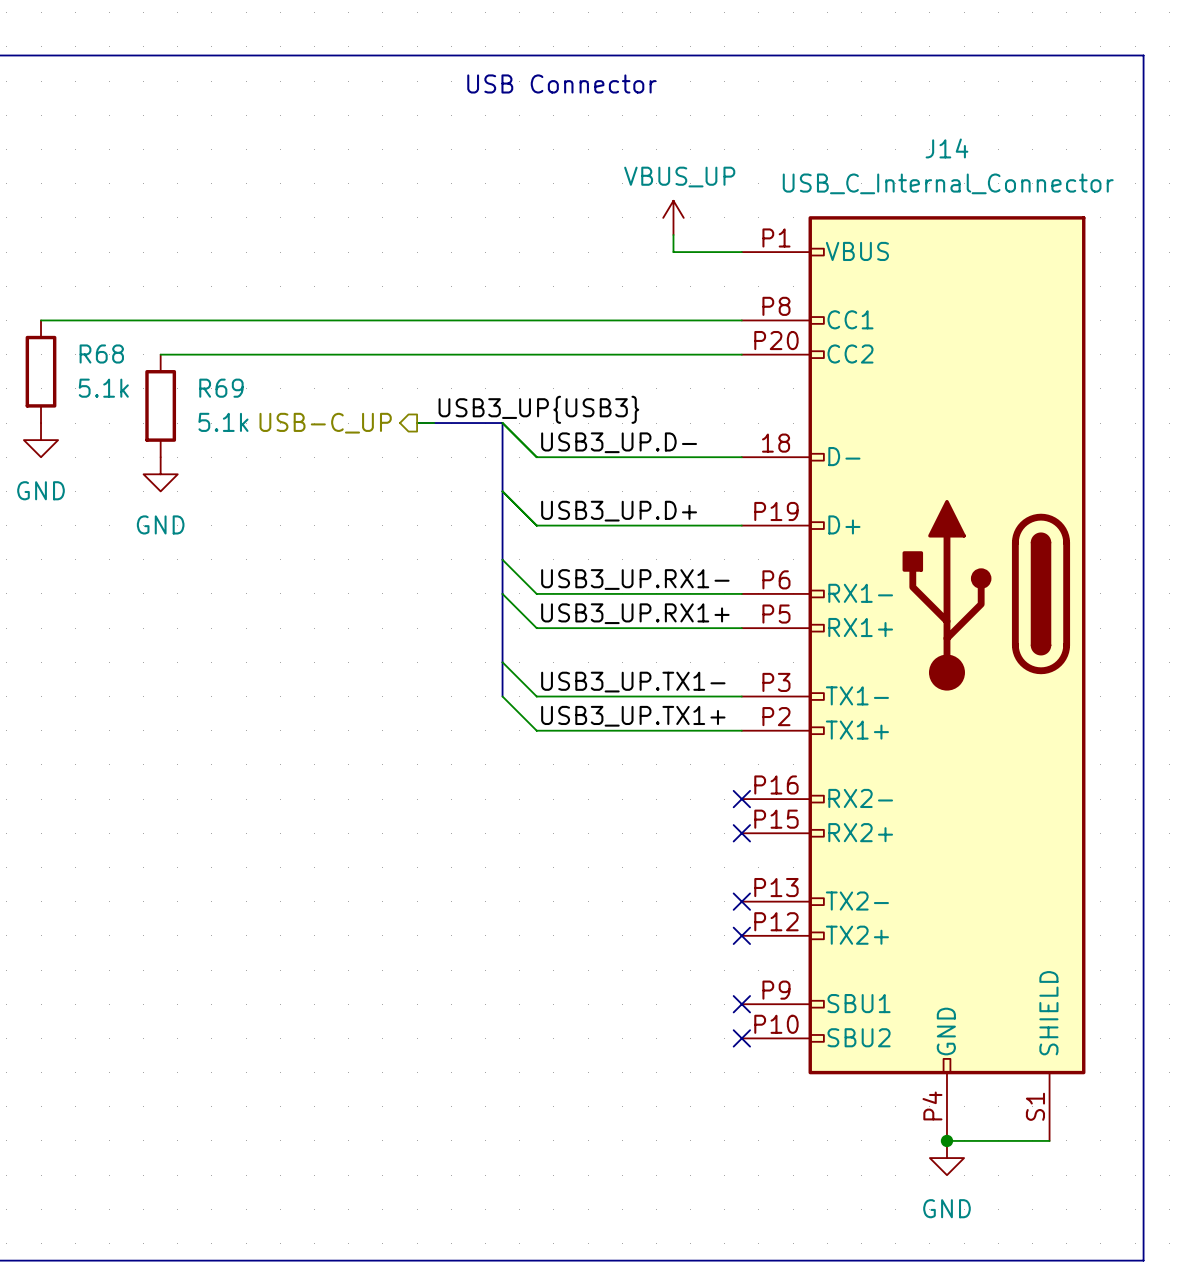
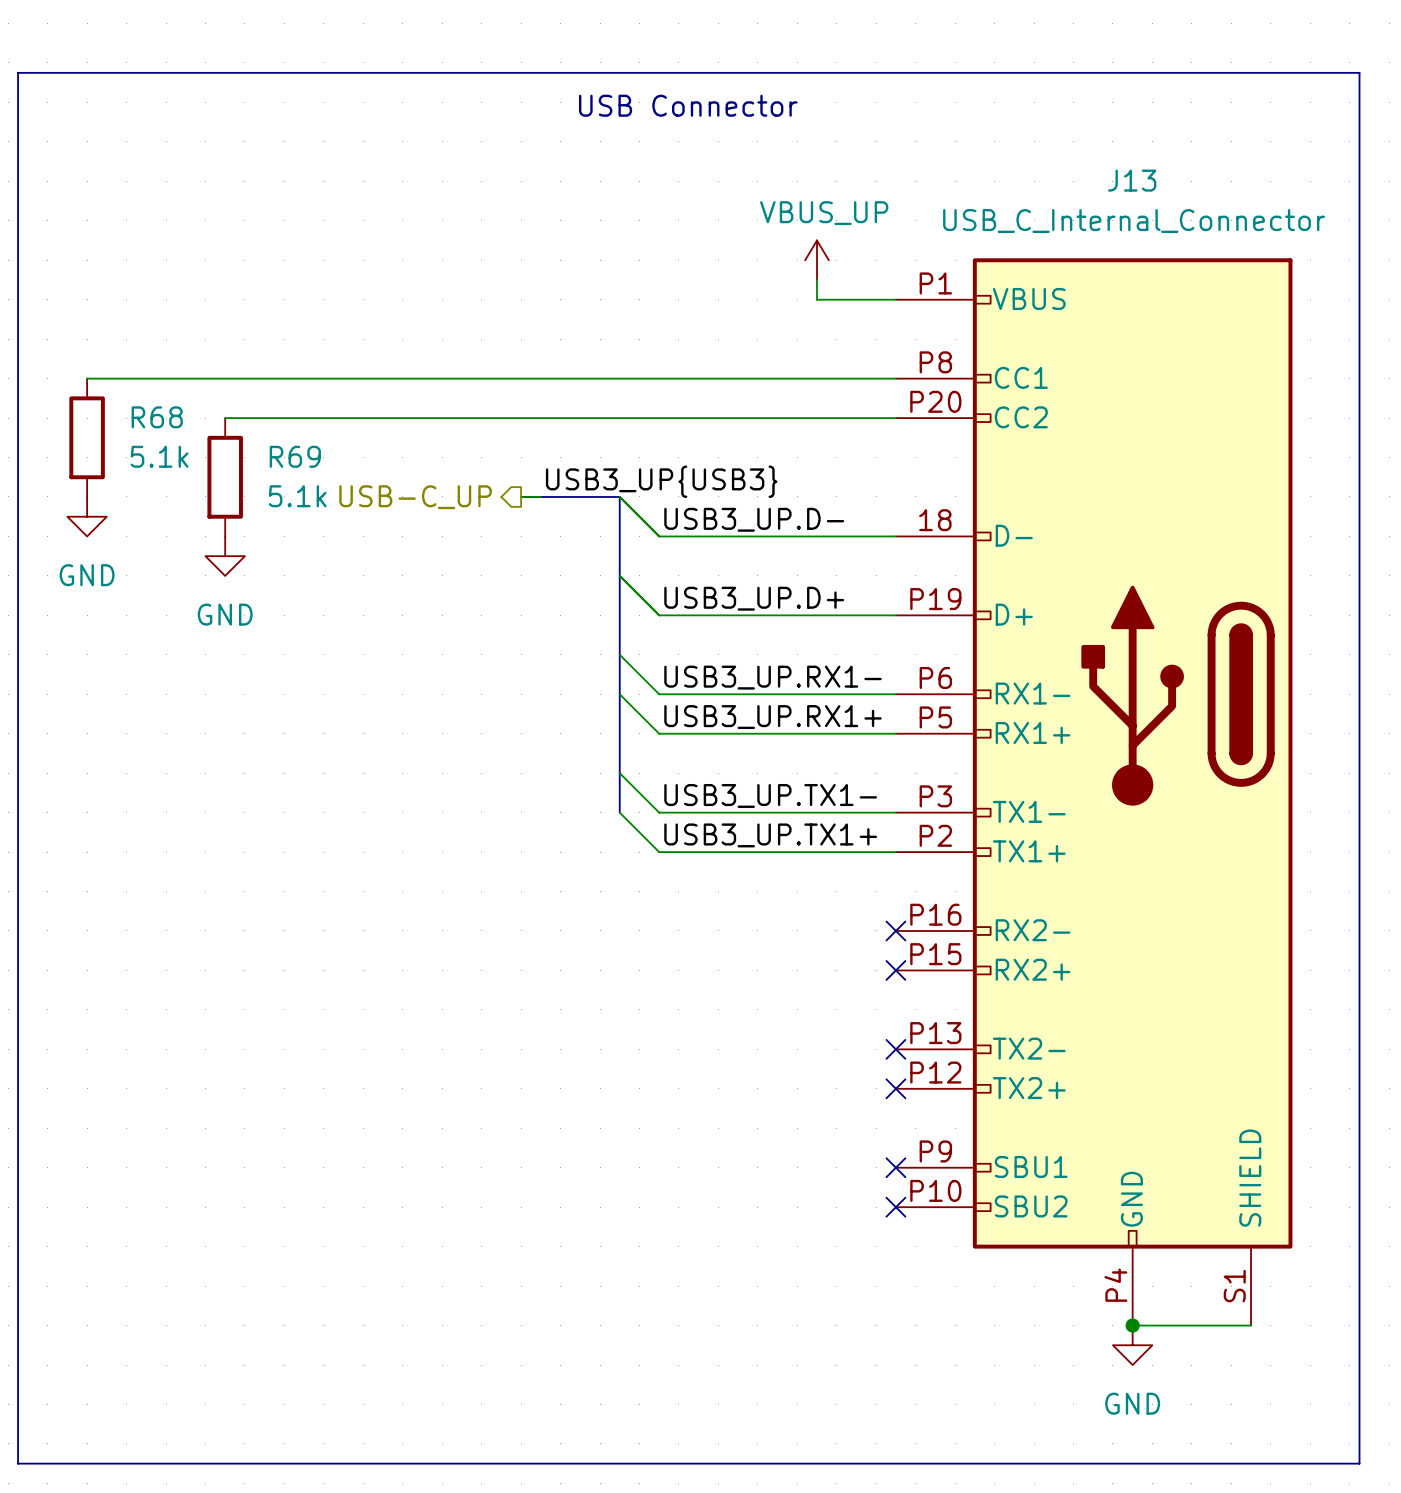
J14 name: J14 (946, 148) -> J13 (1132, 180)

